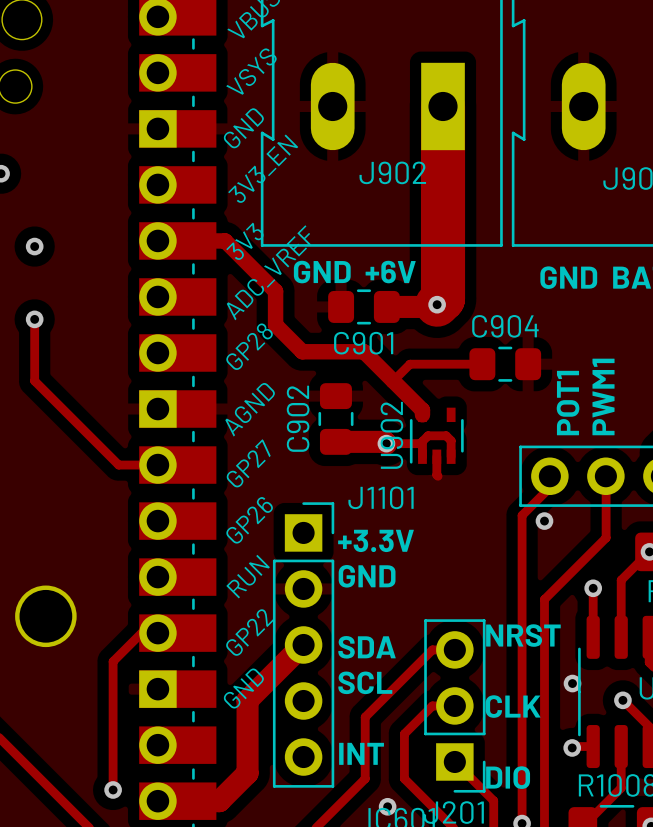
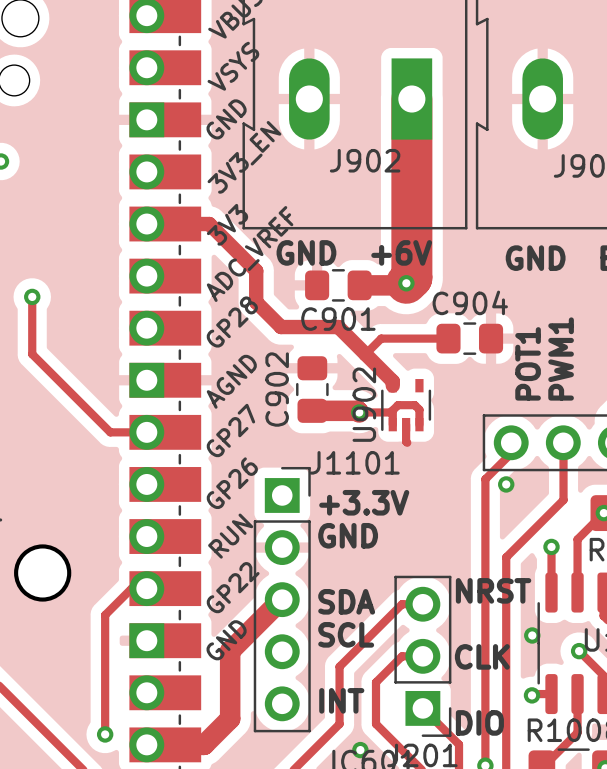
via: (34, 246) -> none

